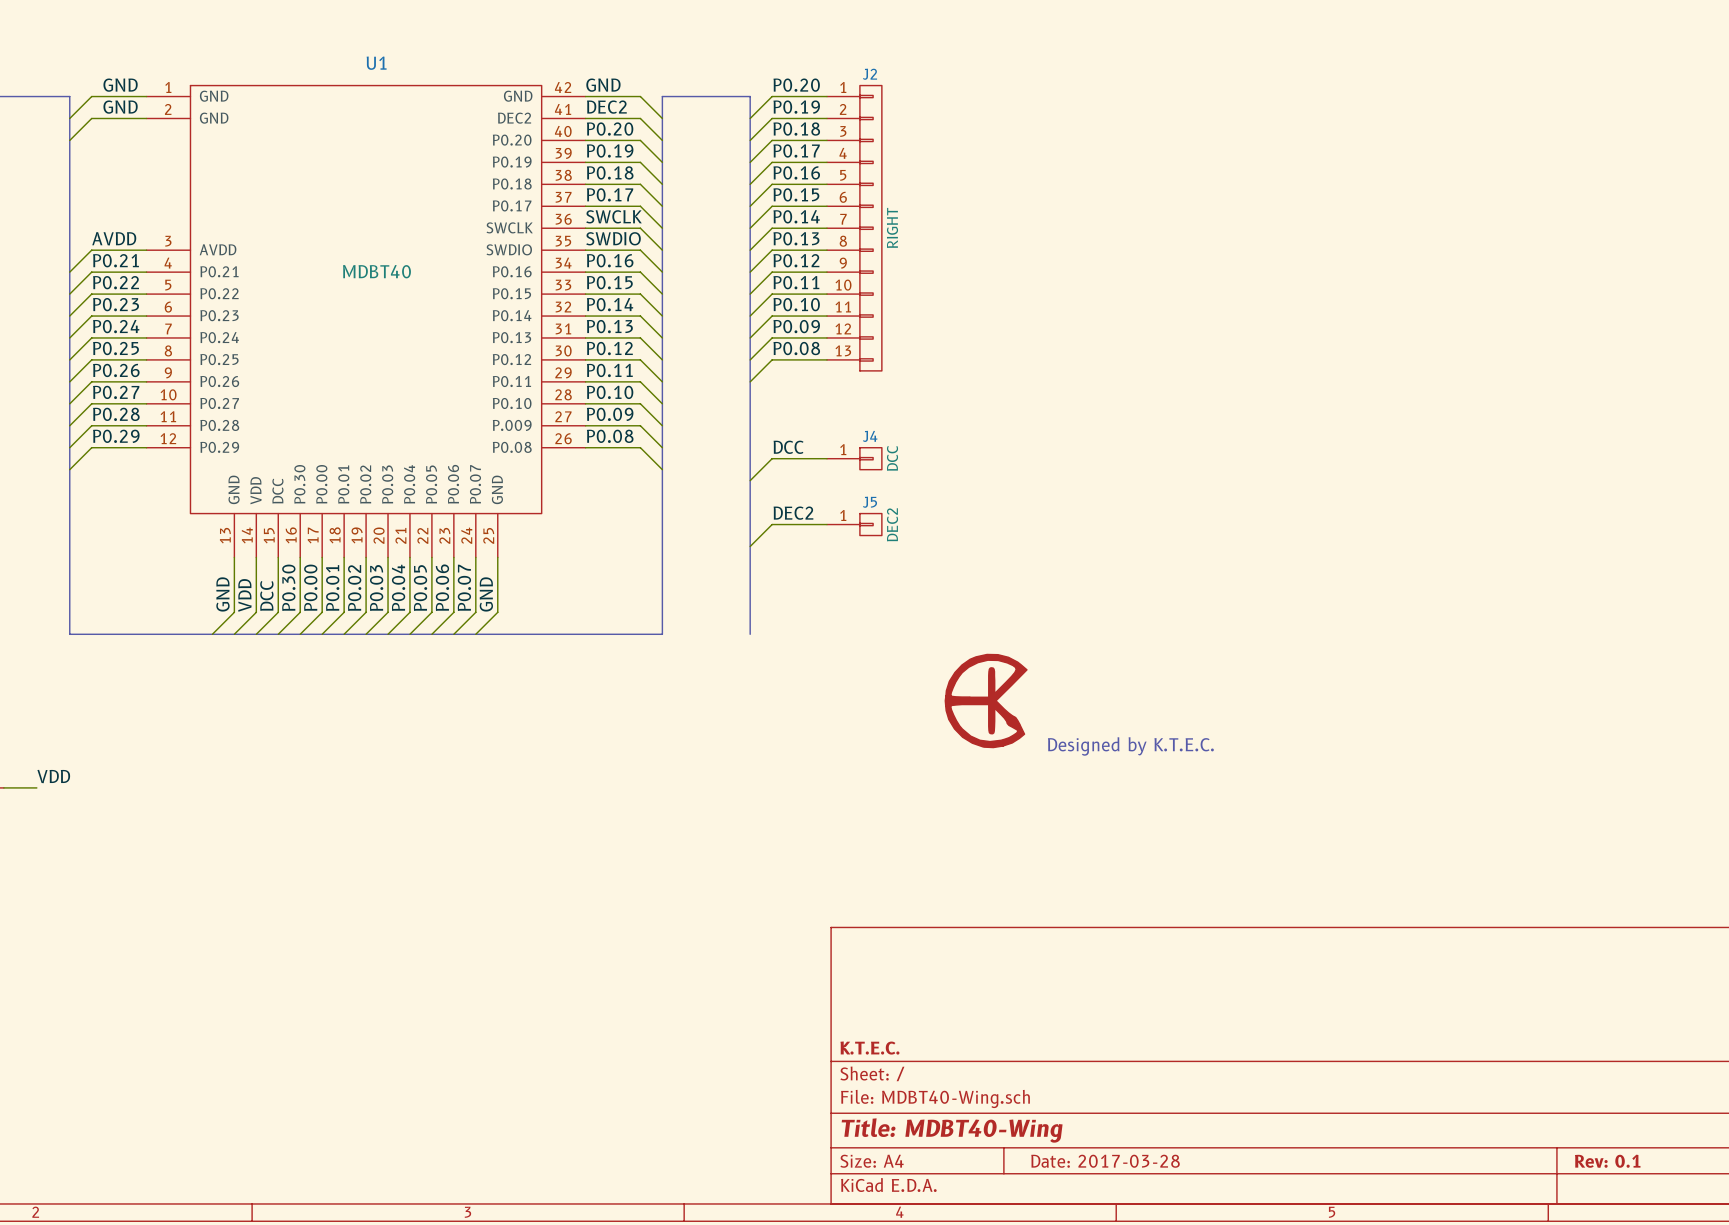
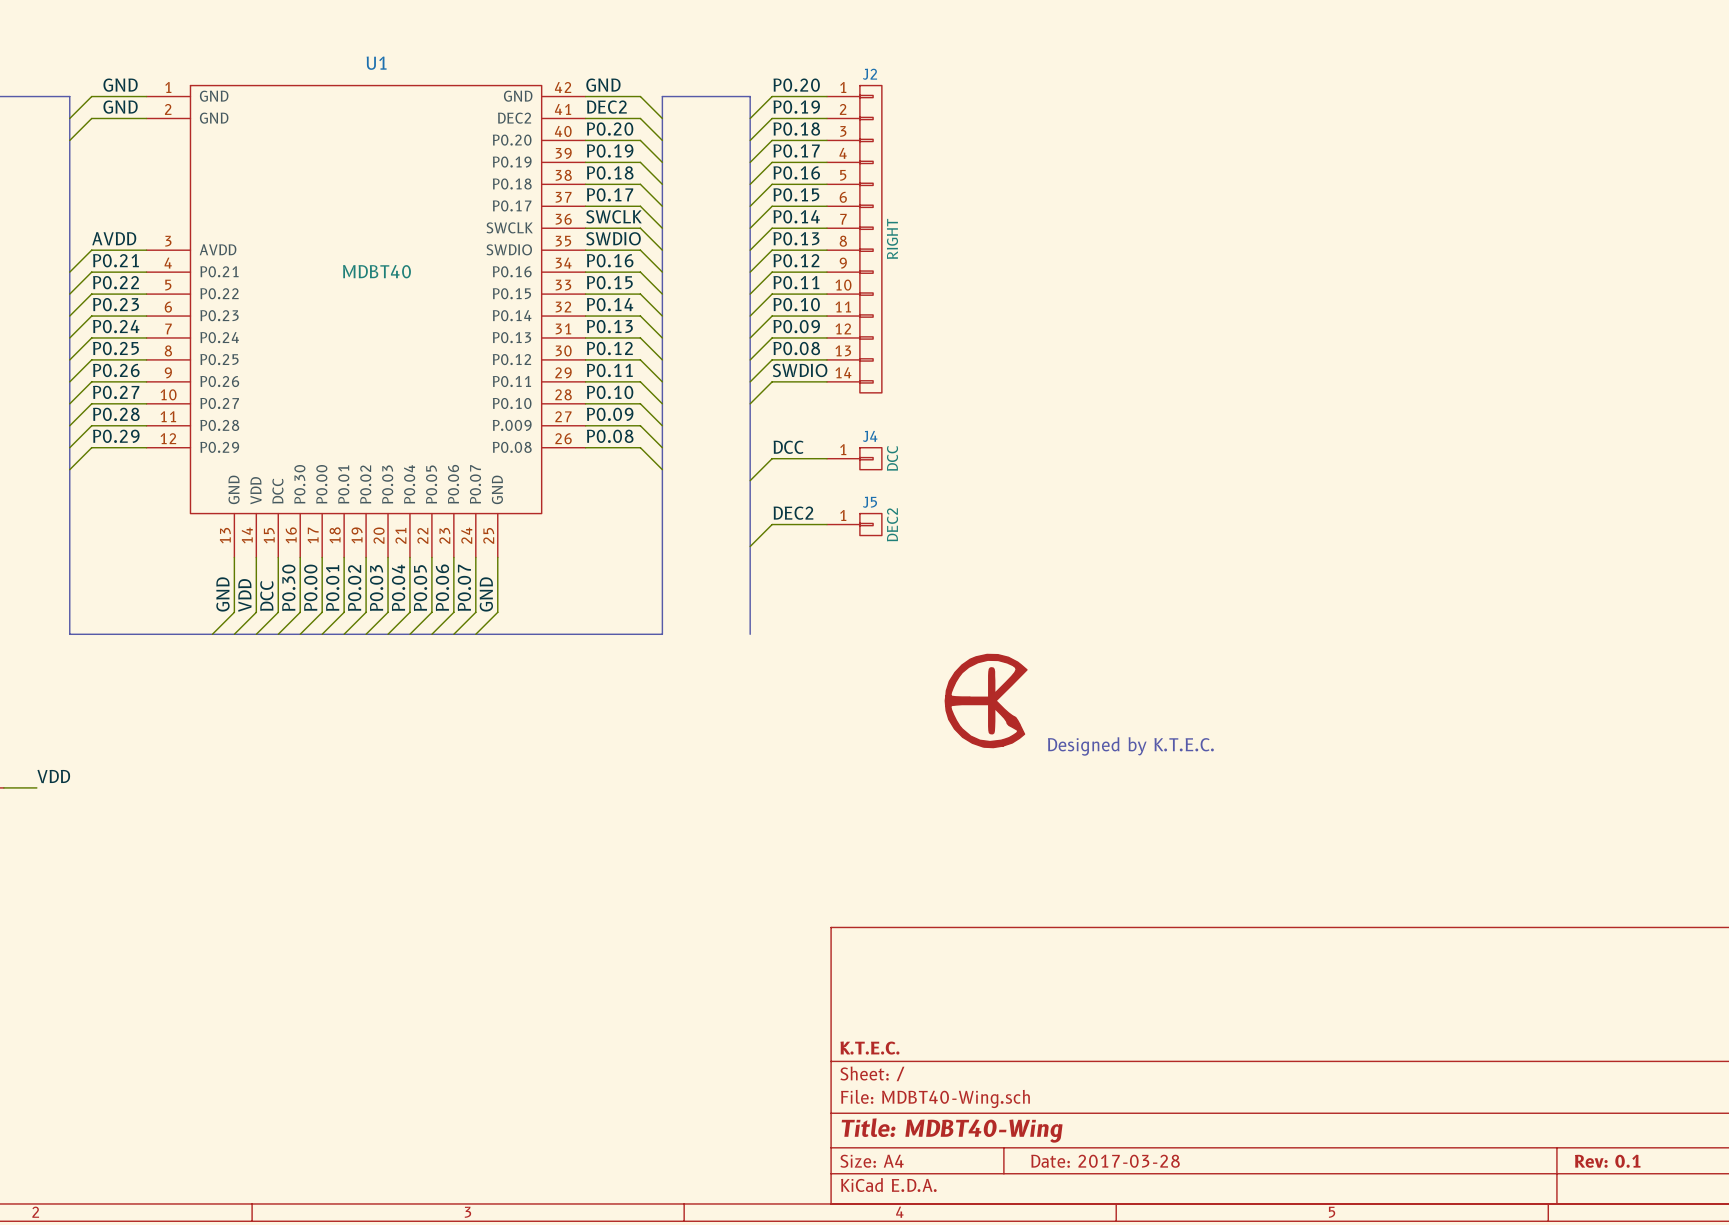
J2 symbol: [826, 85, 882, 371] -> [826, 85, 882, 393]
label: none -> SWDIO (800, 370)
wire: none -> (826, 381) (772, 381) (750, 403)

